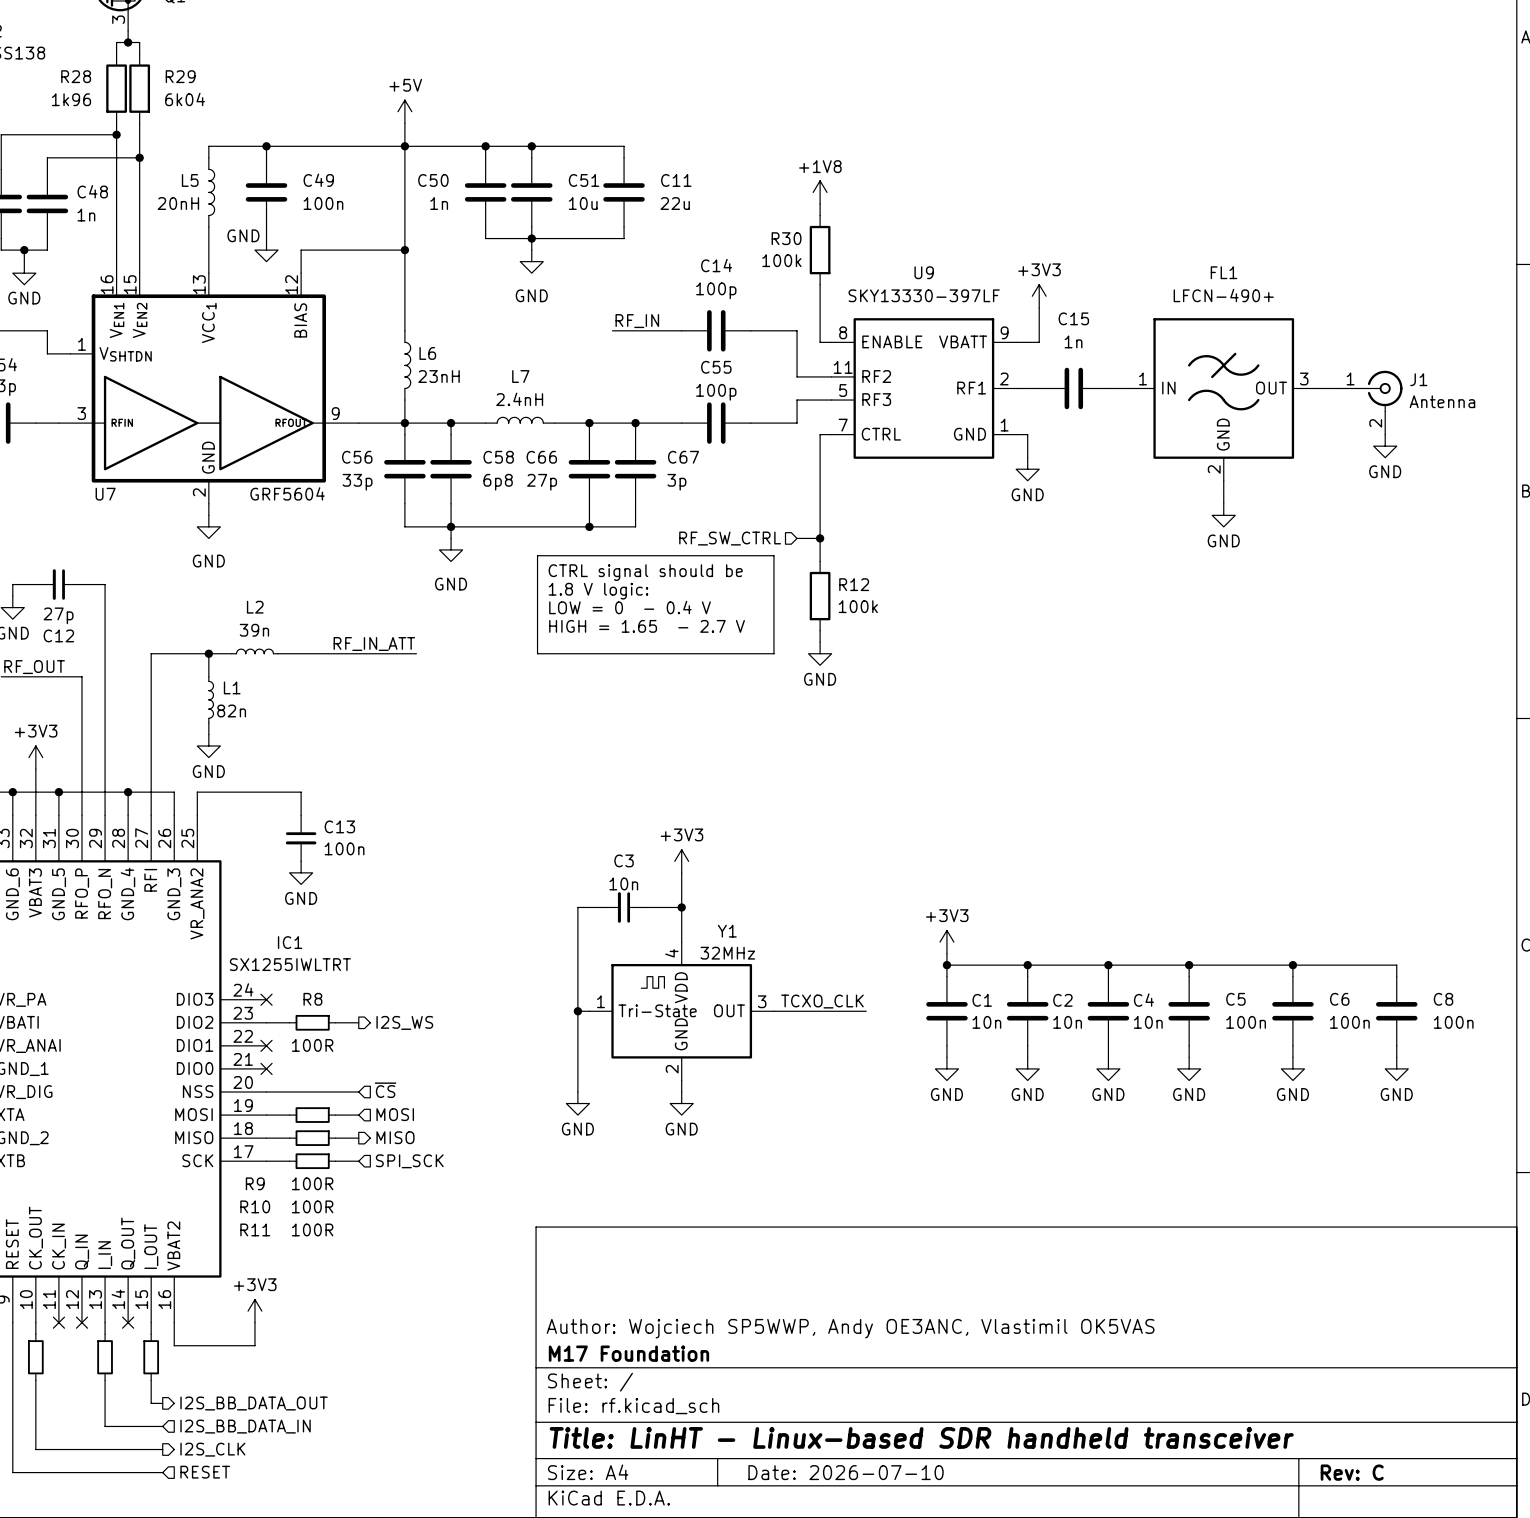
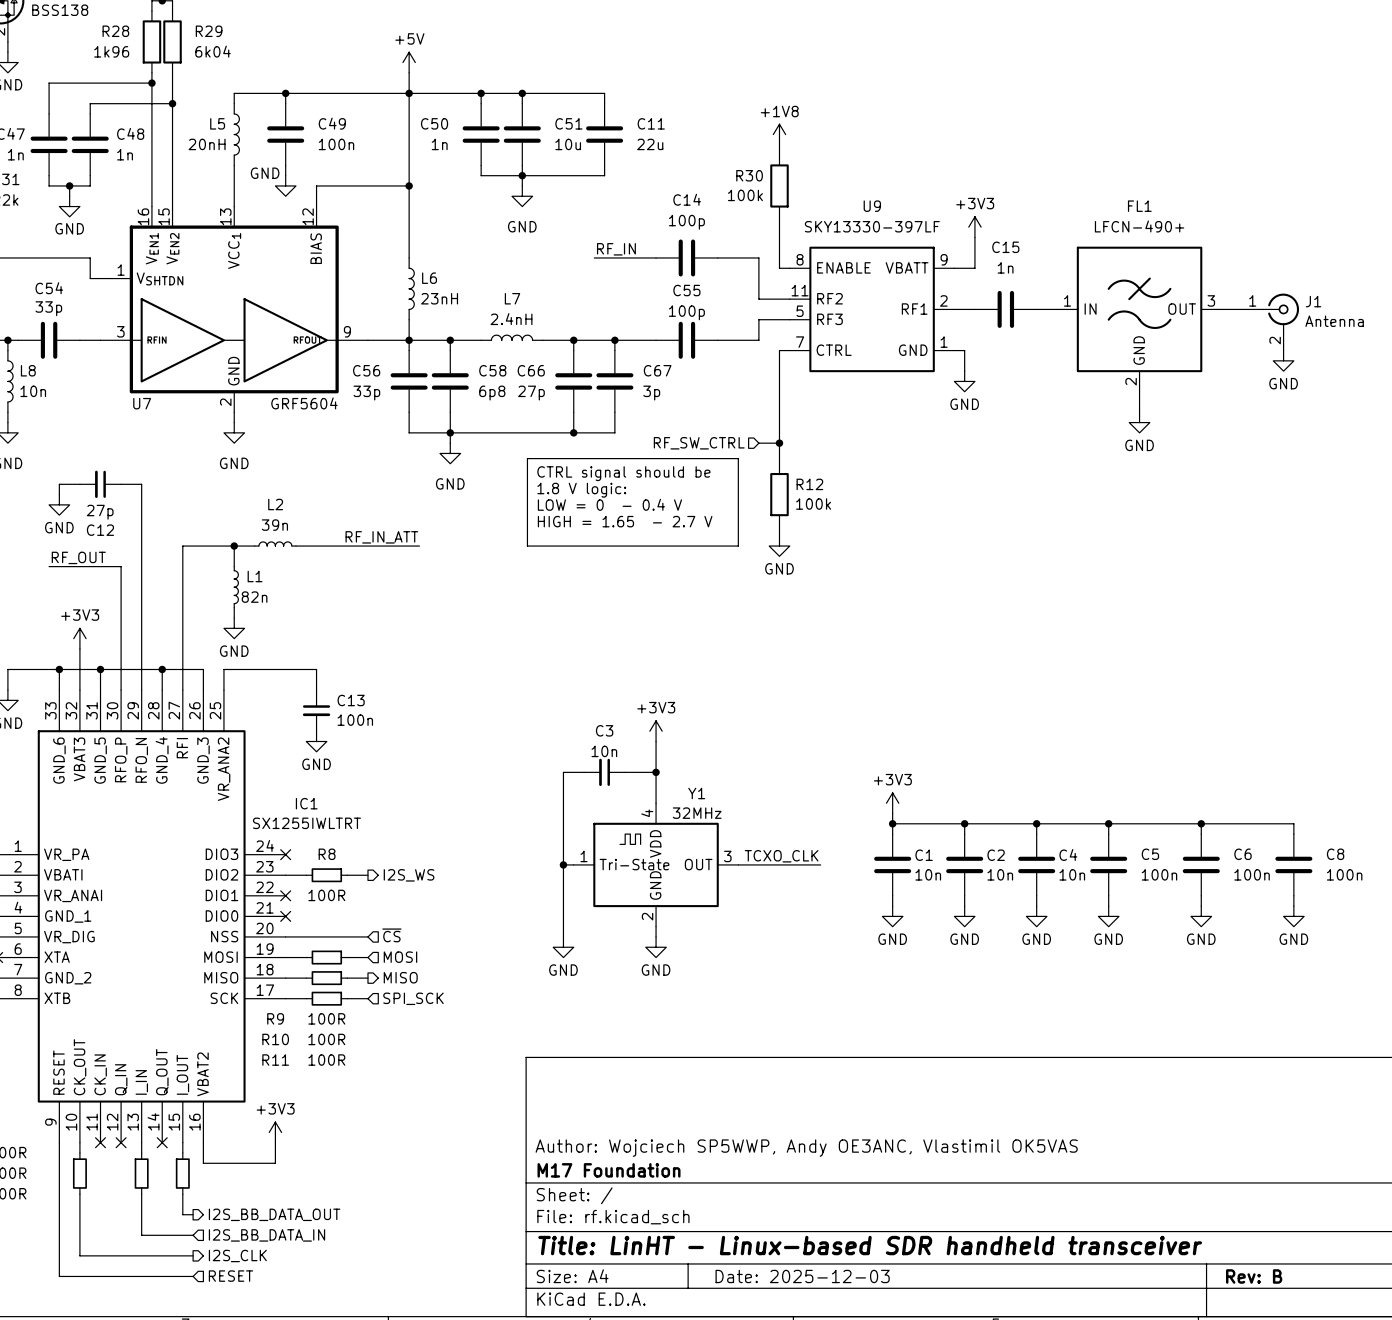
title block: Date: 2026-07-10 (846, 1472) -> Date: 2025-12-03 (802, 1276)
title block: Rev: C (1352, 1472) -> Rev: B (1254, 1276)

